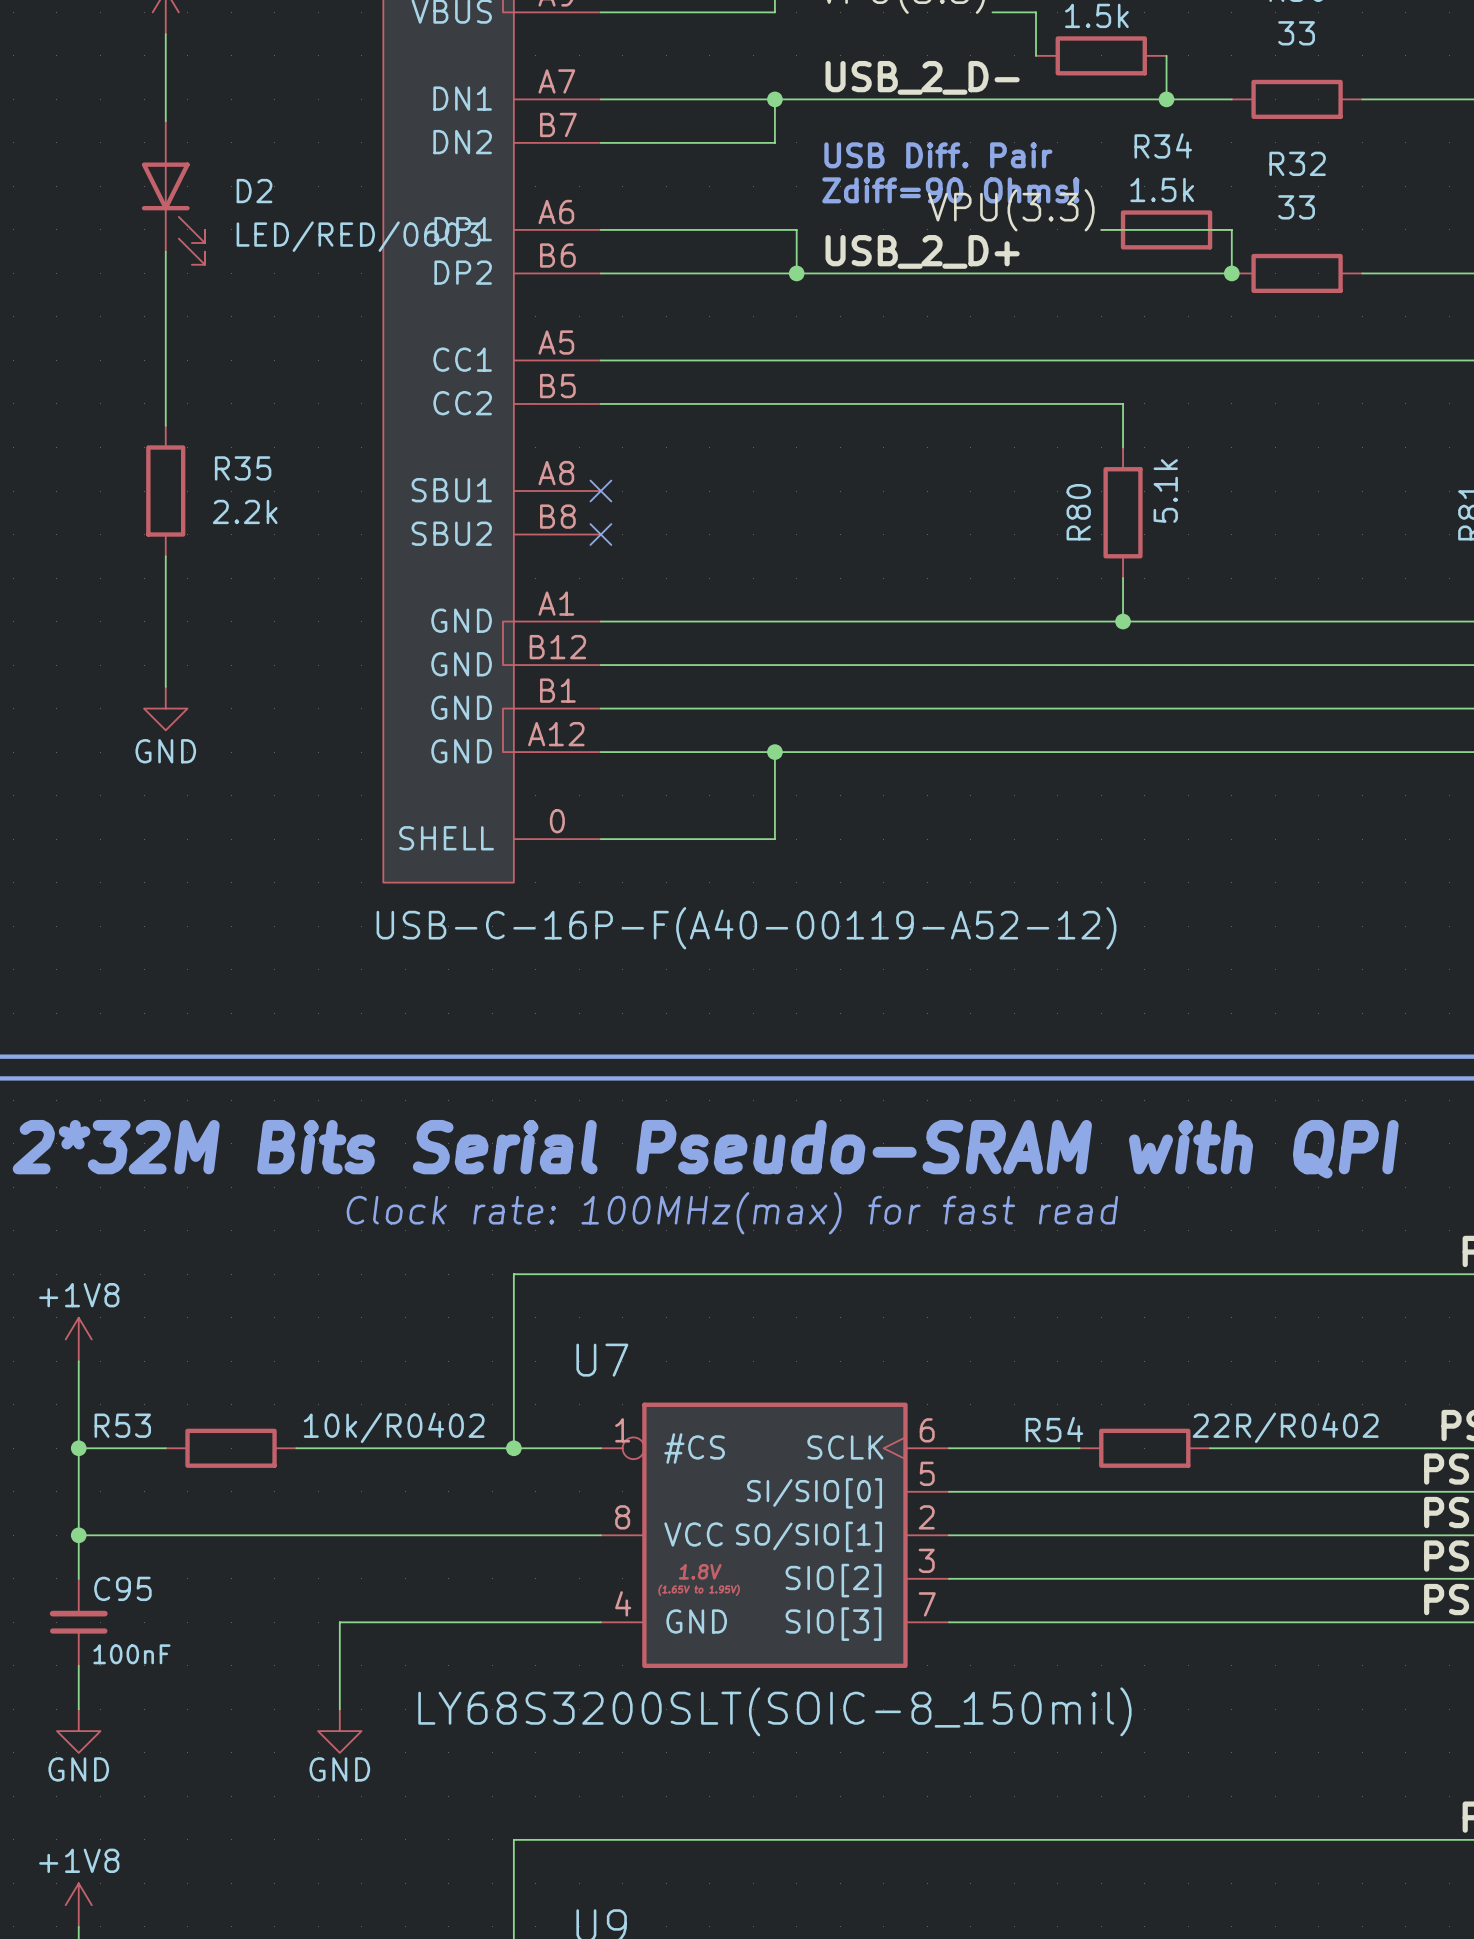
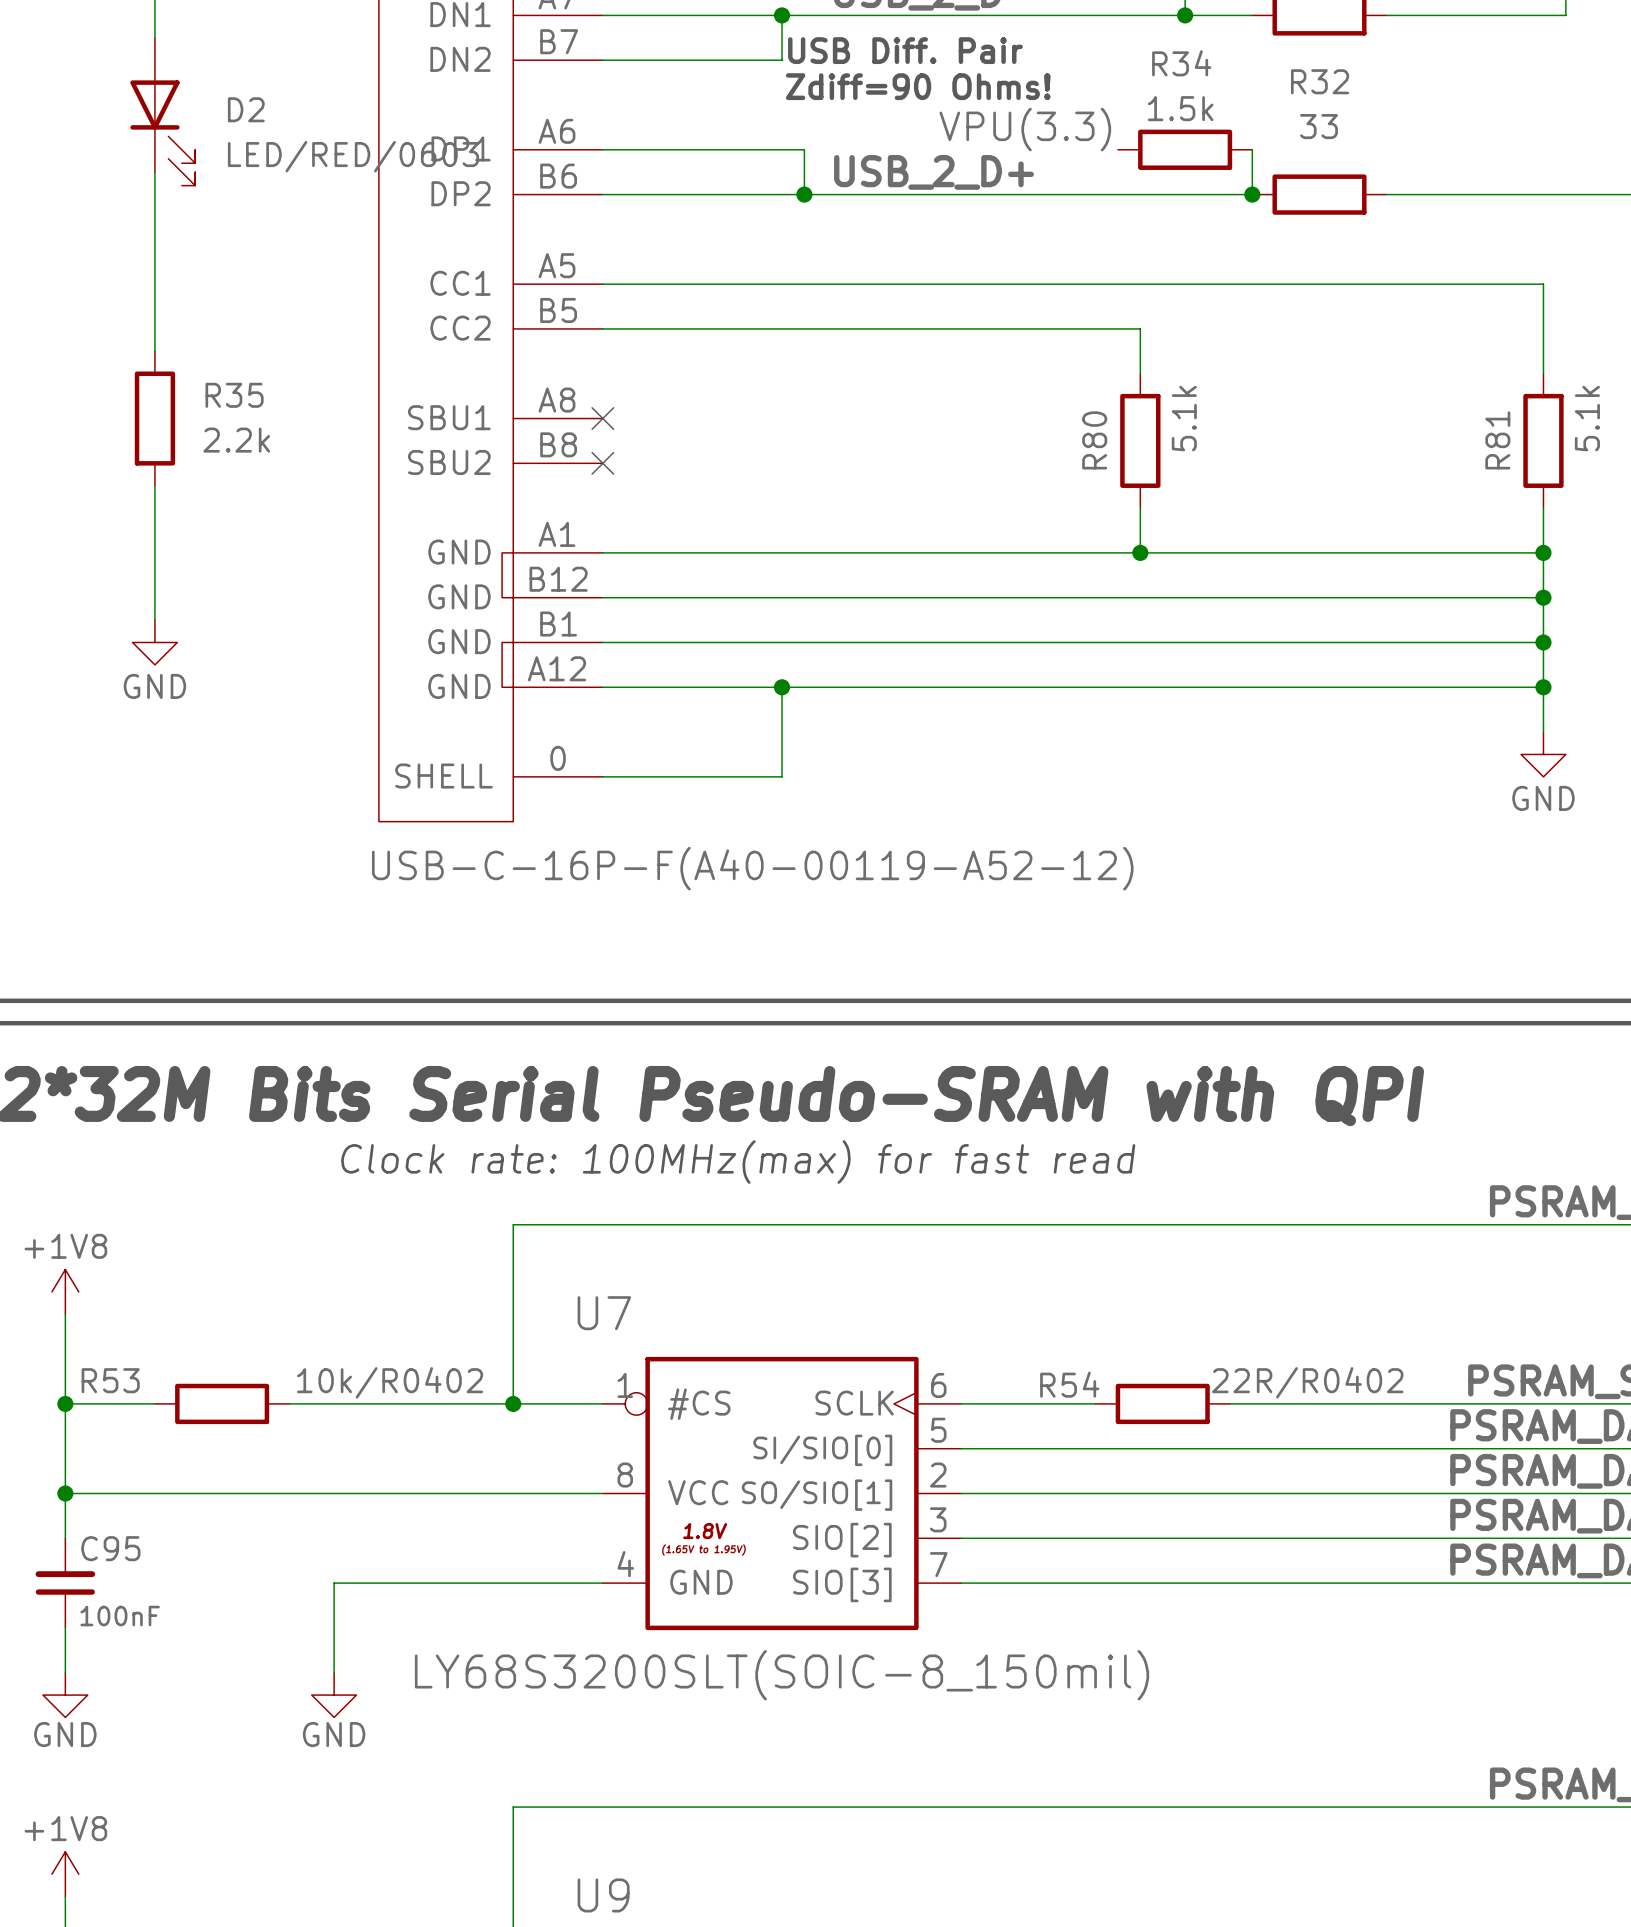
text position: USB Diff. Pair (938, 155) -> USB Diff. Pair (905, 50)
text position: Zdiff=90 Ohms! (950, 190) -> Zdiff=90 Ohms! (918, 86)
wire: (1101, 229) (1231, 229) -> none

